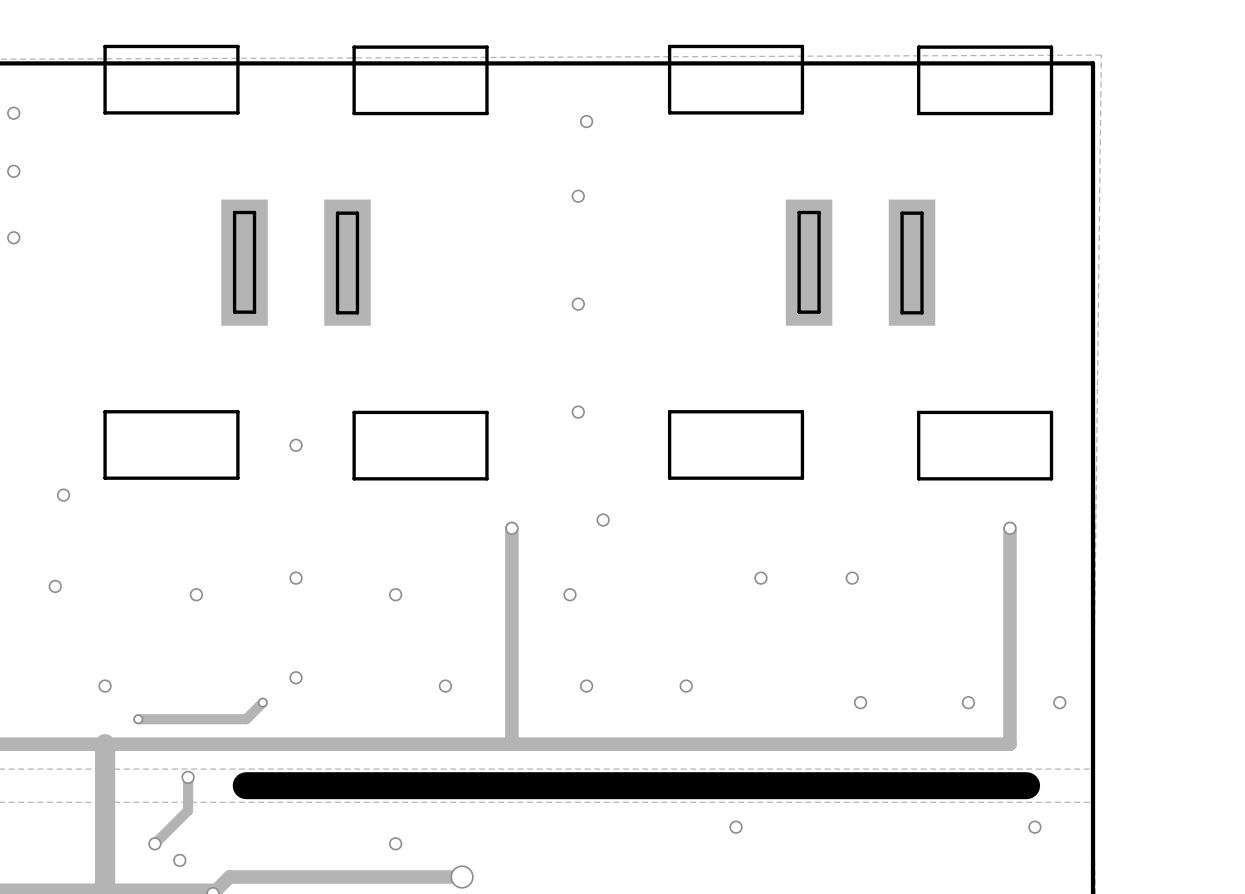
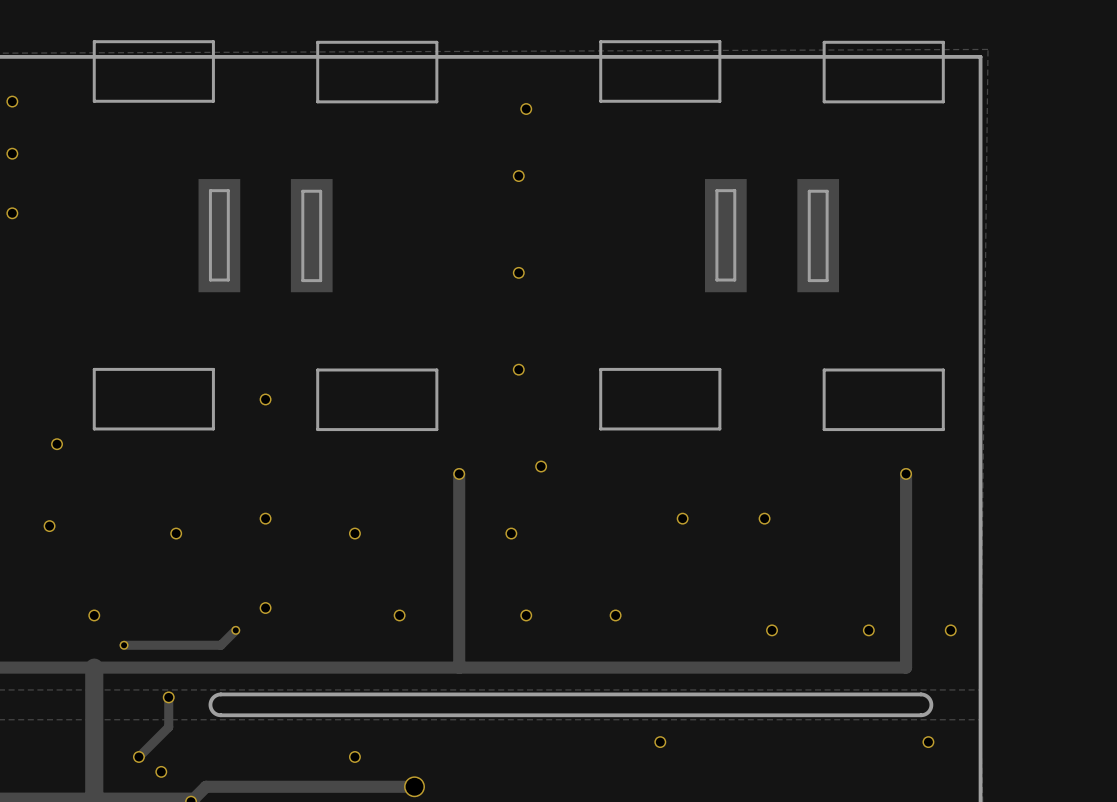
board edge: none -> (920, 694) (220, 694) (213, 697) (210, 704) (213, 712) (220, 715) (920, 715) (928, 712) (931, 704) (928, 697) (920, 694)
board edge: (1026, 785) (246, 785) -> none

